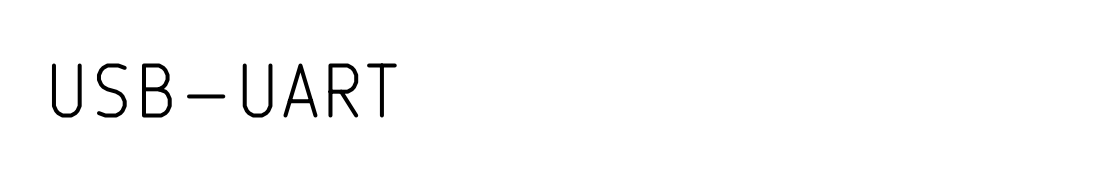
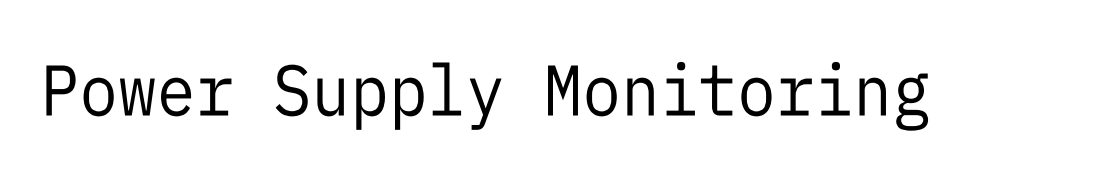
text: USB-UART (224, 90) -> Power Supply Monitoring (487, 96)

